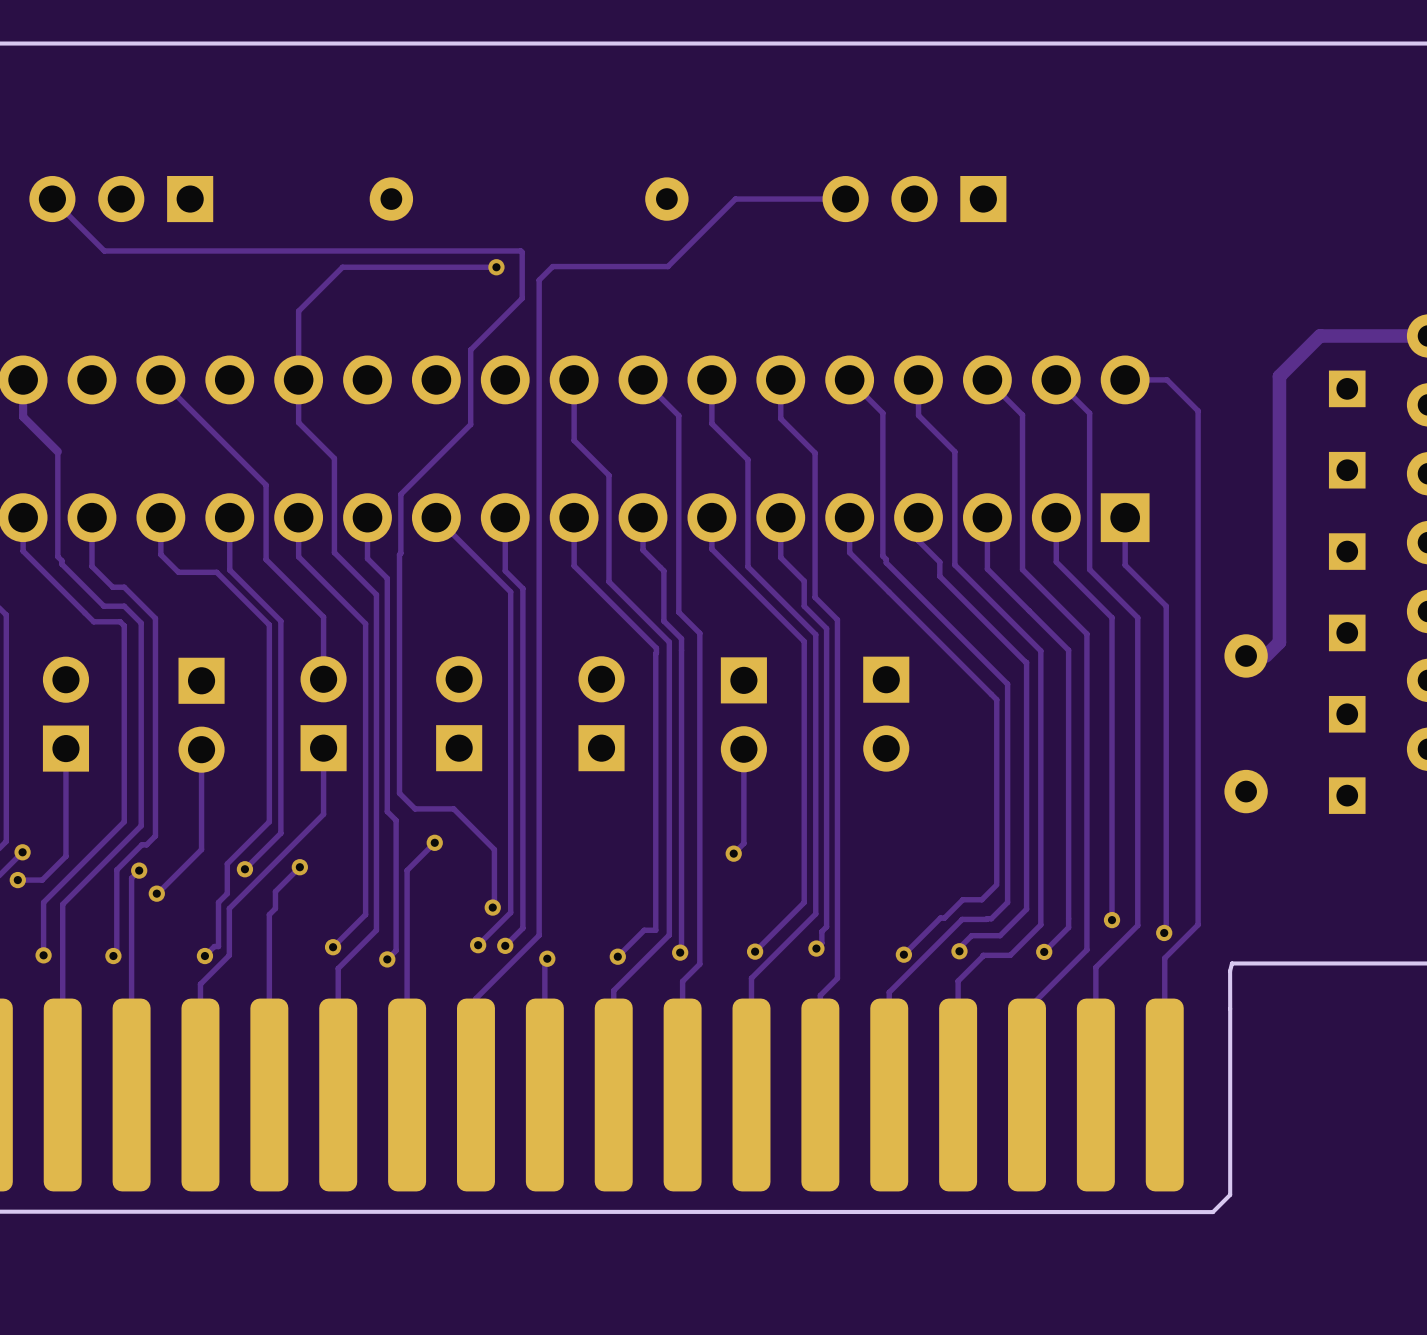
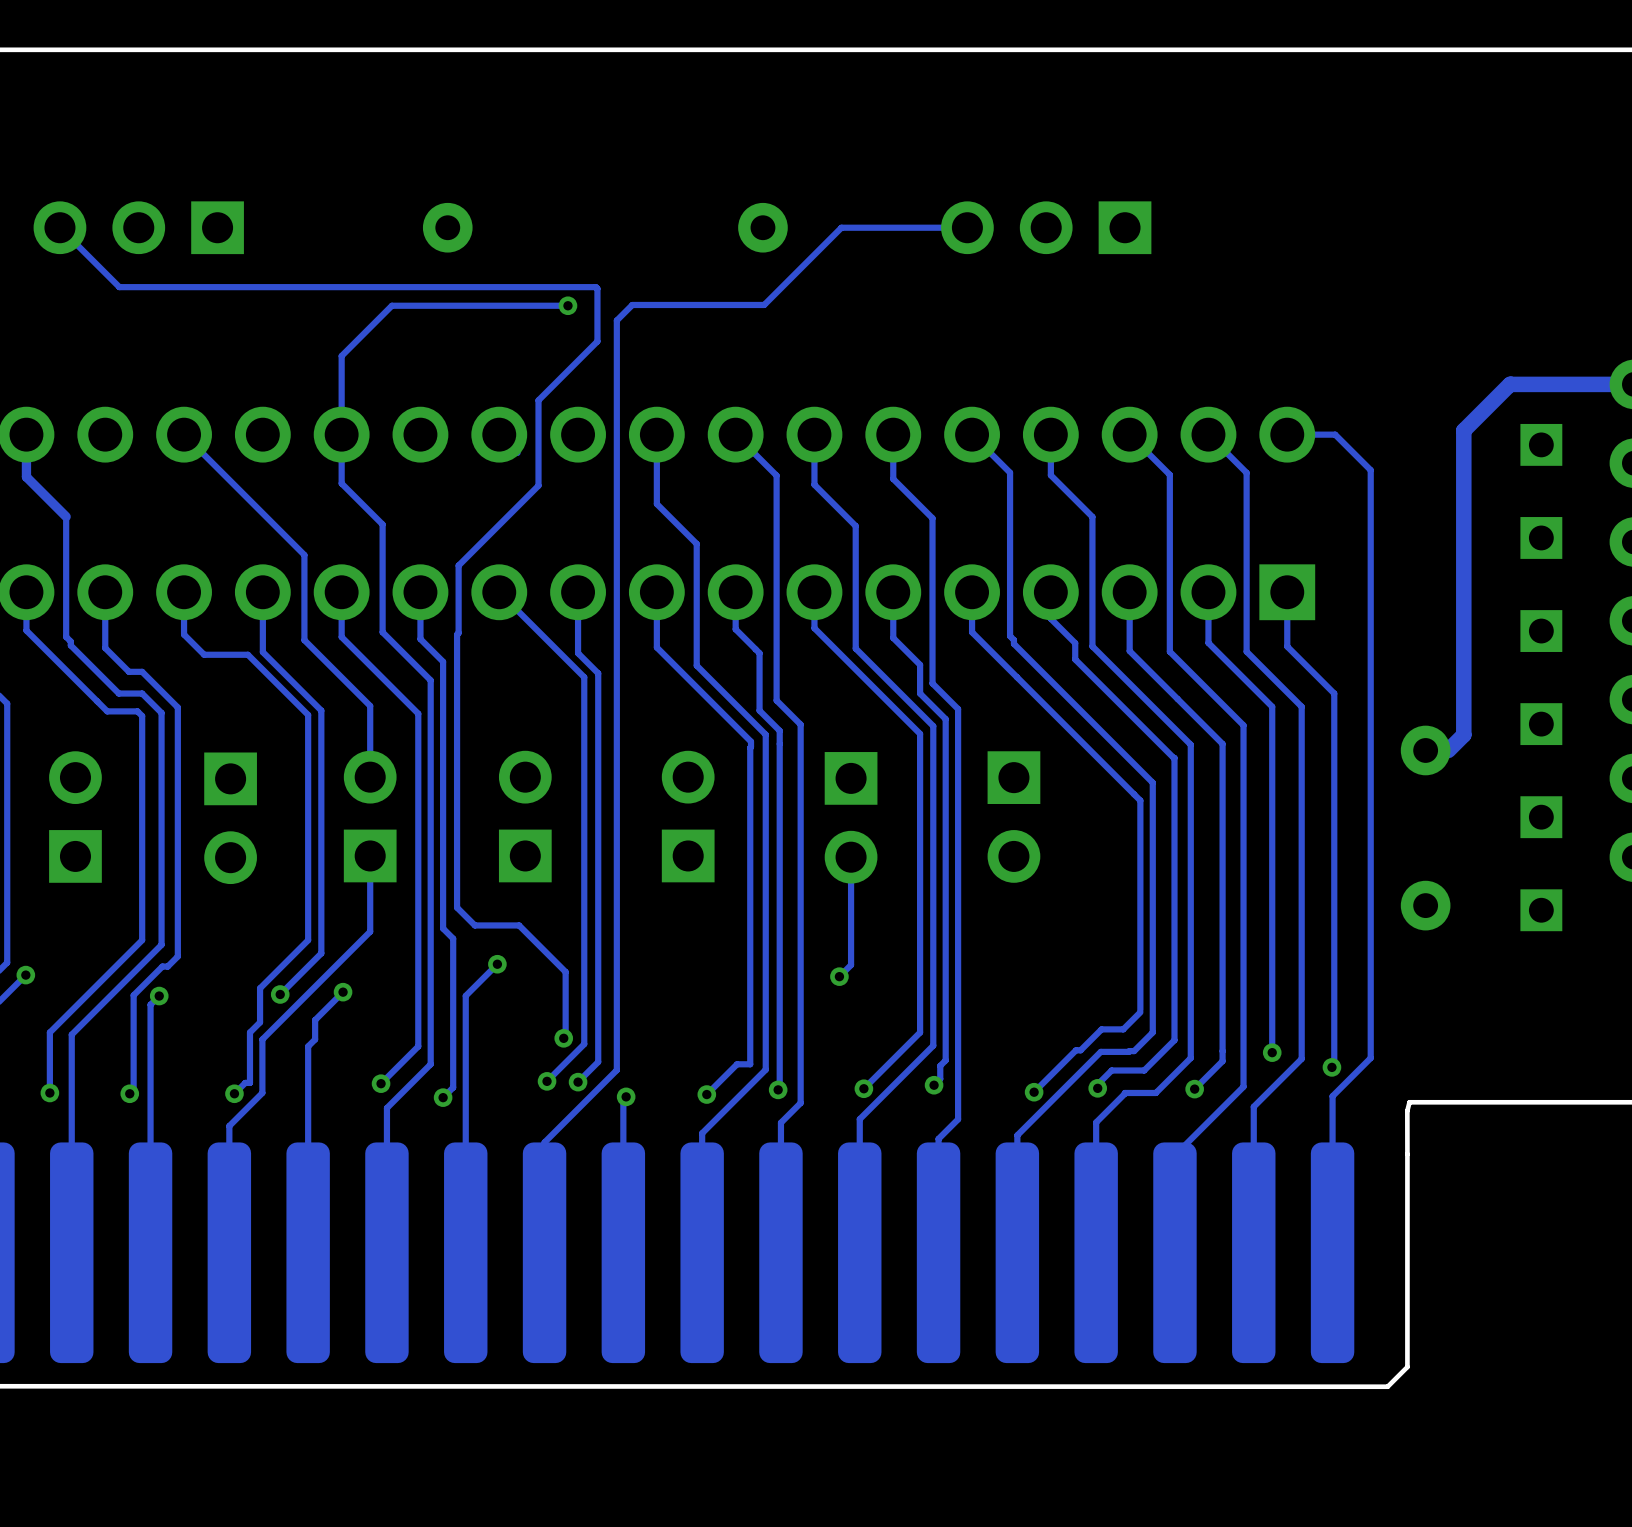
track: (65, 748) (65, 856) (42, 880) (17, 880) -> none
track: (201, 749) (201, 849) (156, 893) -> none
via: (17, 880) -> none
via: (156, 893) -> none

